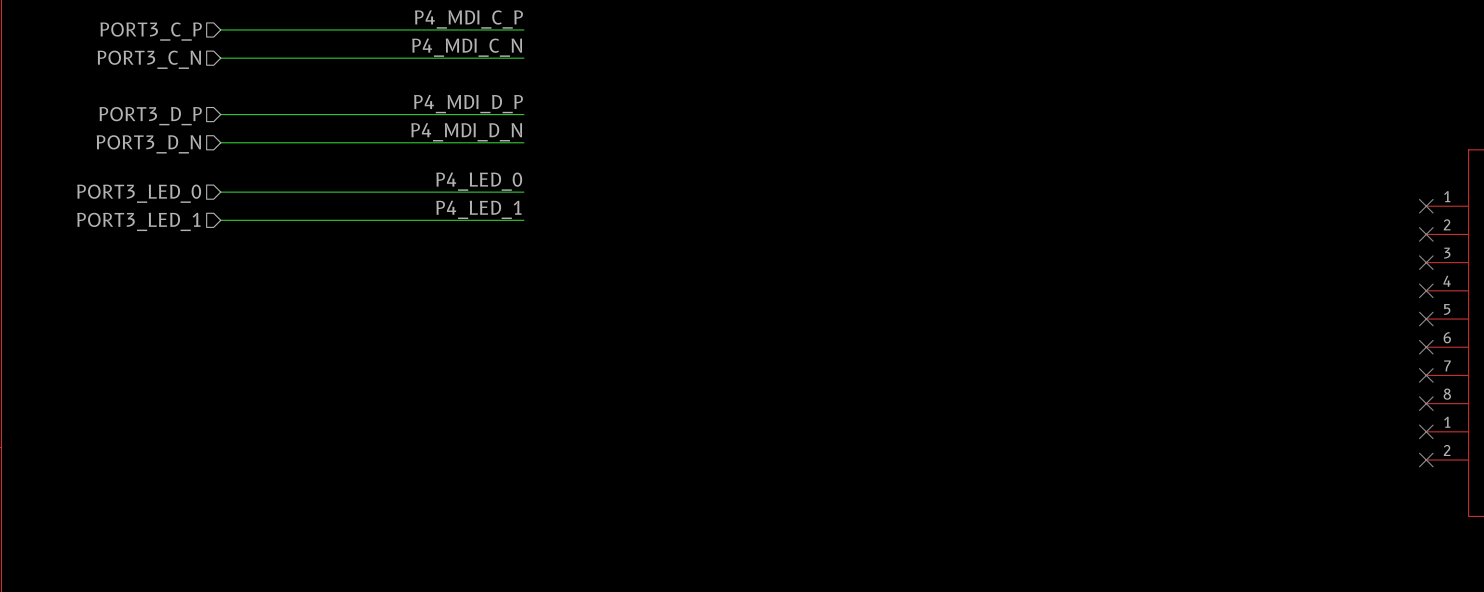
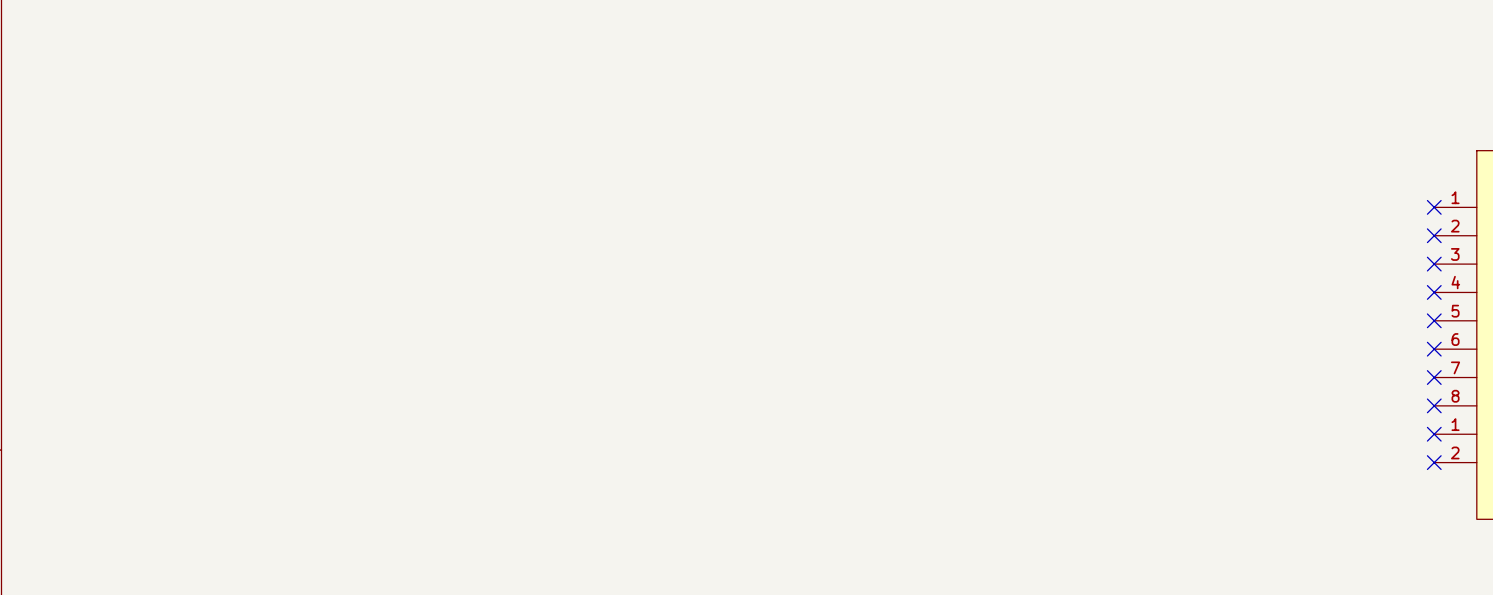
label: P4_MDI_C_P (468, 19) -> none
wire: (220, 29) (523, 29) -> none
hierarchical label: PORT3_C_P (151, 31) -> none
label: P4_MDI_C_N (467, 47) -> none
wire: (220, 58) (523, 58) -> none
hierarchical label: PORT3_C_N (149, 59) -> none
label: P4_MDI_D_P (468, 104) -> none
wire: (220, 114) (523, 114) -> none
hierarchical label: PORT3_D_P (150, 116) -> none
label: P4_MDI_D_N (466, 132) -> none
wire: (220, 142) (523, 142) -> none
hierarchical label: PORT3_D_N (148, 144) -> none
label: P4_LED_0 (479, 181) -> none
wire: (220, 192) (523, 192) -> none
hierarchical label: PORT3_LED_0 (139, 193) -> none
label: P4_LED_1 (478, 209) -> none
wire: (220, 220) (523, 220) -> none
hierarchical label: PORT3_LED_1 (138, 221) -> none

